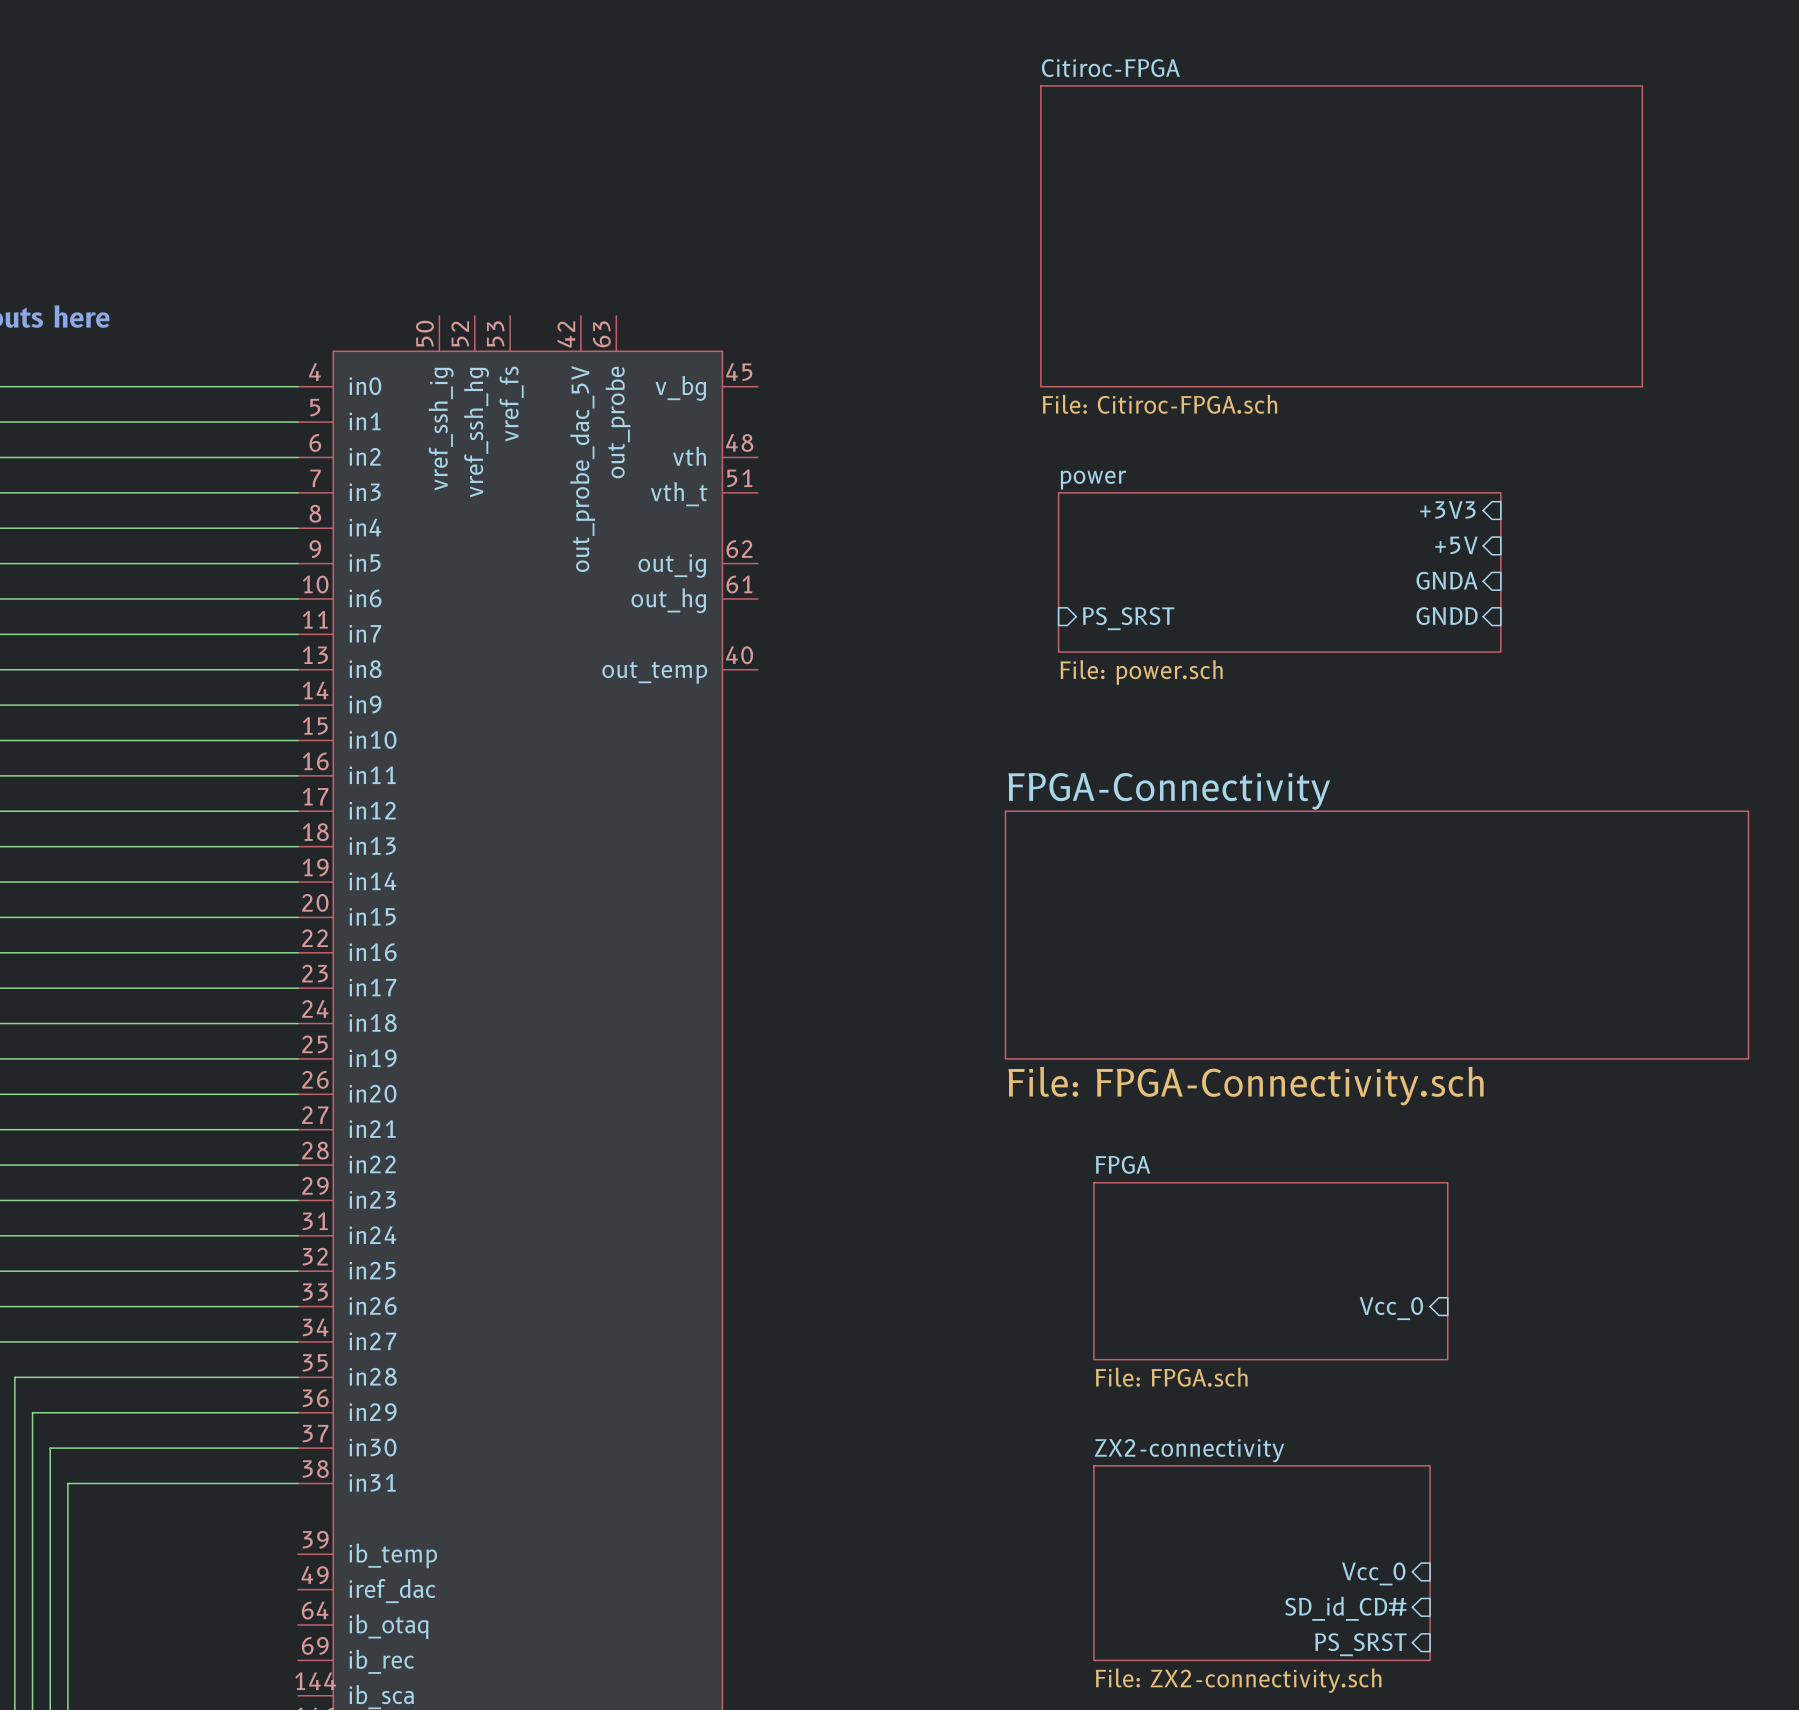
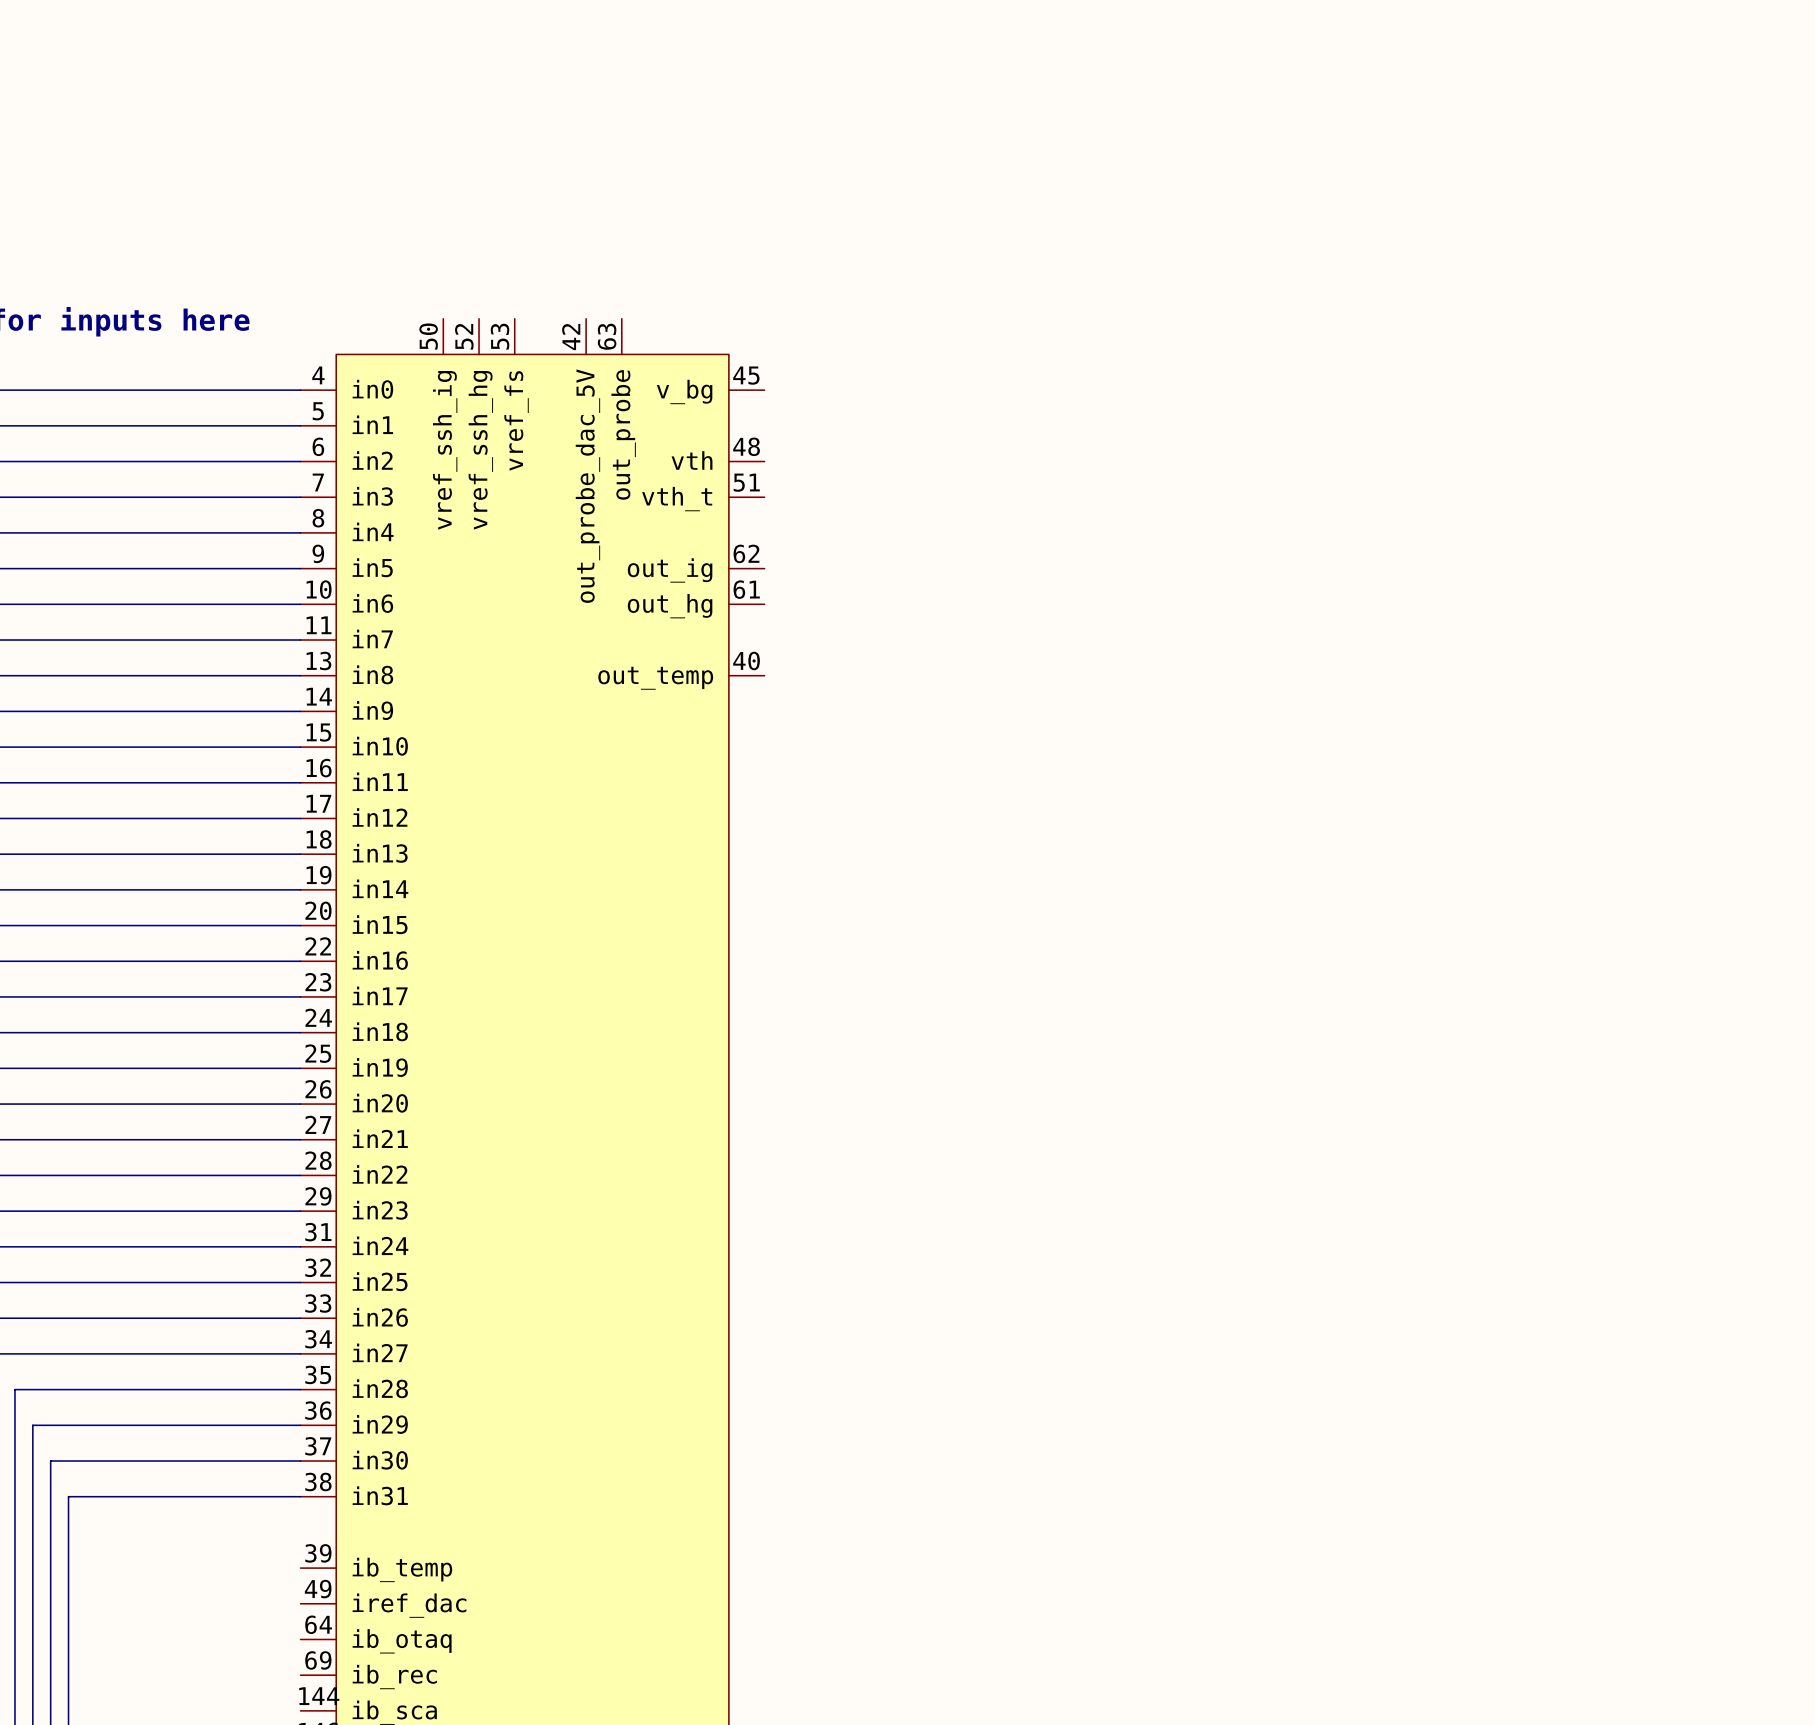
sheet Citiroc-FPGA: File: Citiroc-FPGA.sch (1341, 236) -> none
sheet pin: +3V3 (1447, 509) -> none
sheet pin: +5V (1456, 545) -> none
sheet power: File: power.sch (1279, 572) -> none
sheet pin: GNDA (1447, 580) -> none
sheet pin: GNDD (1447, 616) -> none
sheet pin: PS_SRST (1128, 618) -> none
sheet FPGA-Connectivity: File: FPGA-Connectivity.sch (1376, 935) -> none
sheet FPGA: File: FPGA.sch (1270, 1271) -> none
sheet pin: Vcc_0 (1391, 1308) -> none
sheet ZX2-connectivity: File: ZX2-connectivity.sch (1262, 1563) -> none
sheet pin: Vcc_0 (1373, 1573) -> none
sheet pin: SD_id_CD# (1345, 1608) -> none
sheet pin: PS_SRST (1360, 1644) -> none

